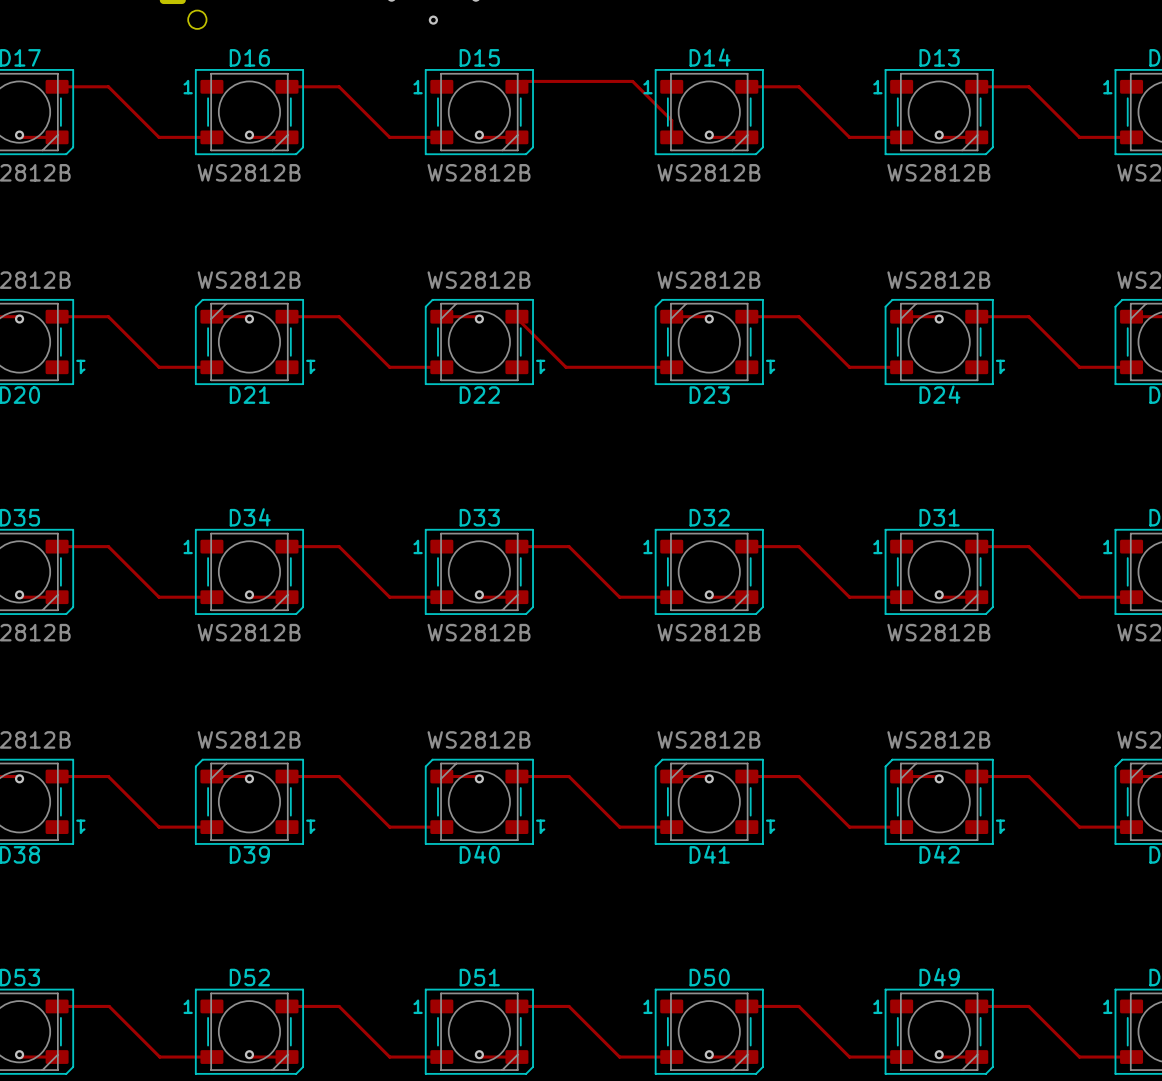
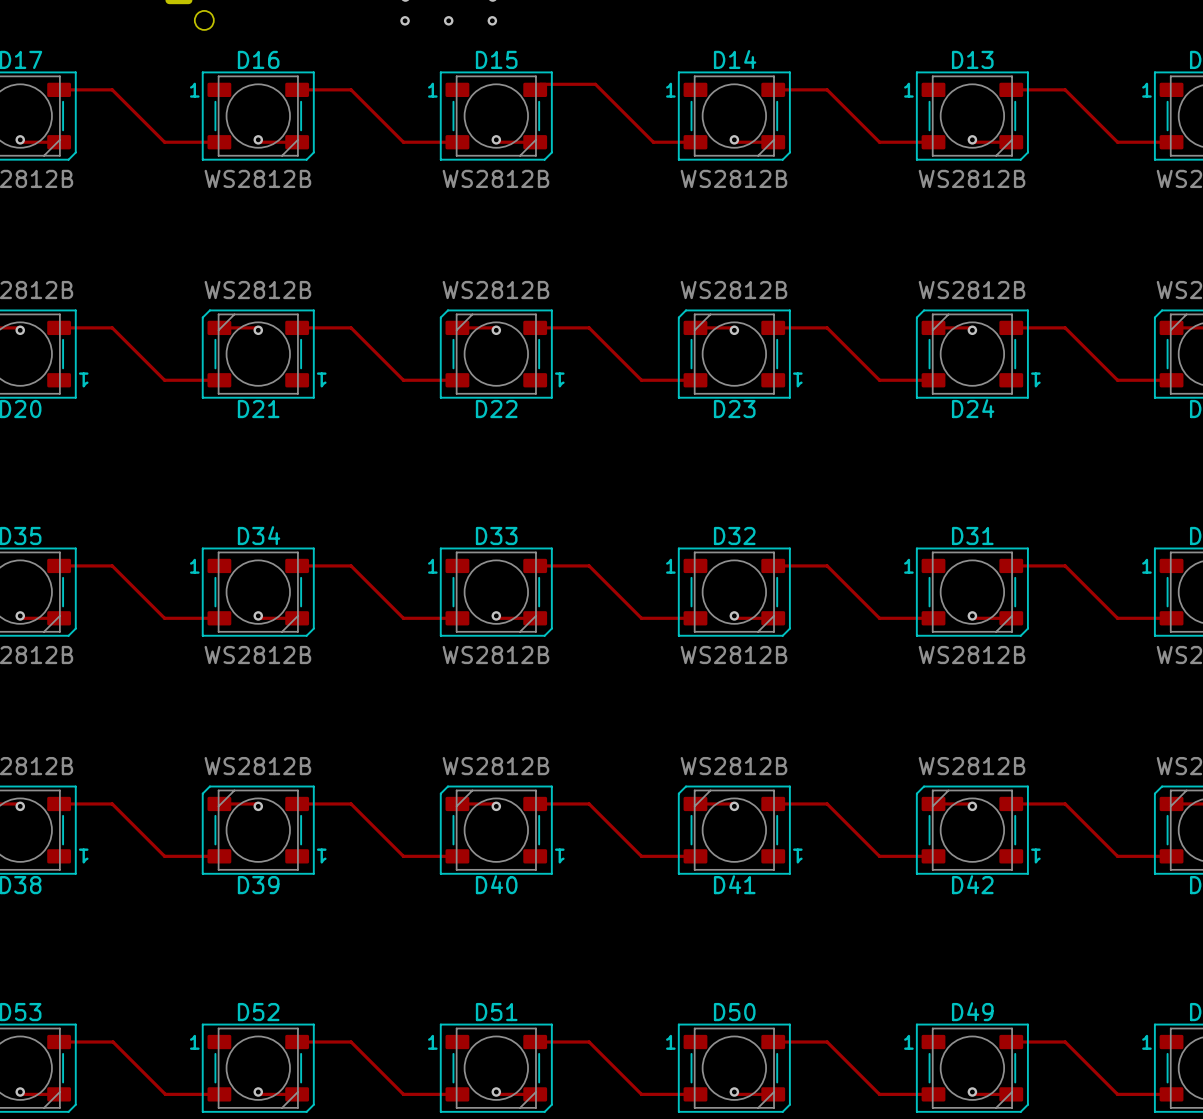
via: none -> (405, 20)
via: none -> (492, 20)
track: (575, 81) (632, 81) (671, 120) (671, 137) -> (595, 84) (653, 142) (695, 142)
track: (516, 316) (565, 367) (619, 367) -> (535, 327) (589, 327) (641, 380)

